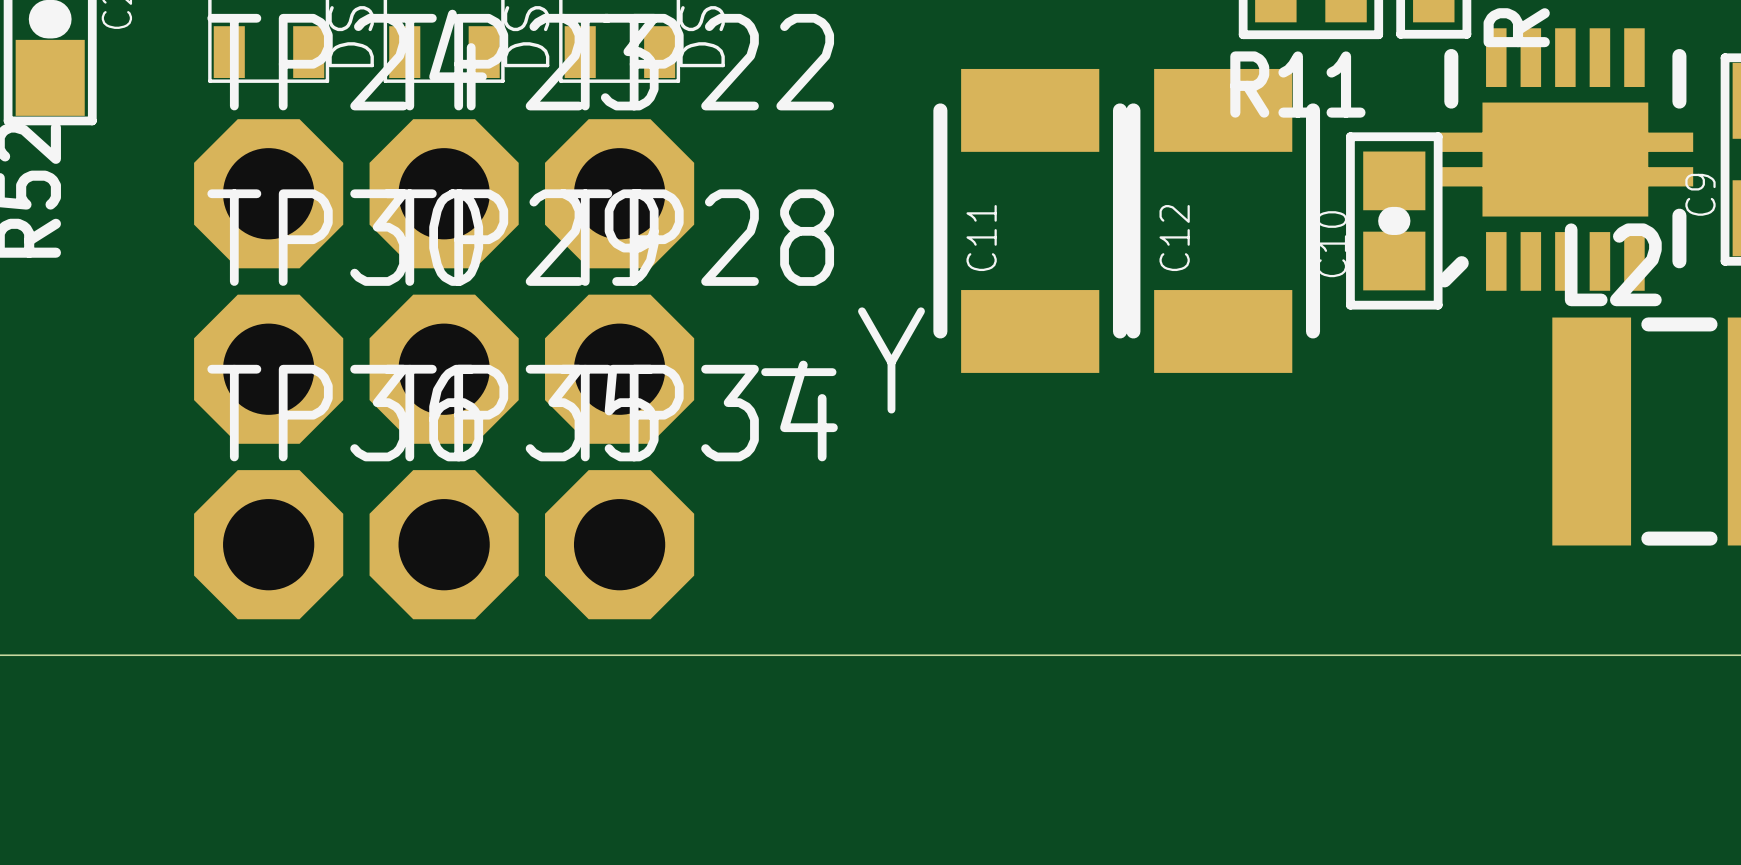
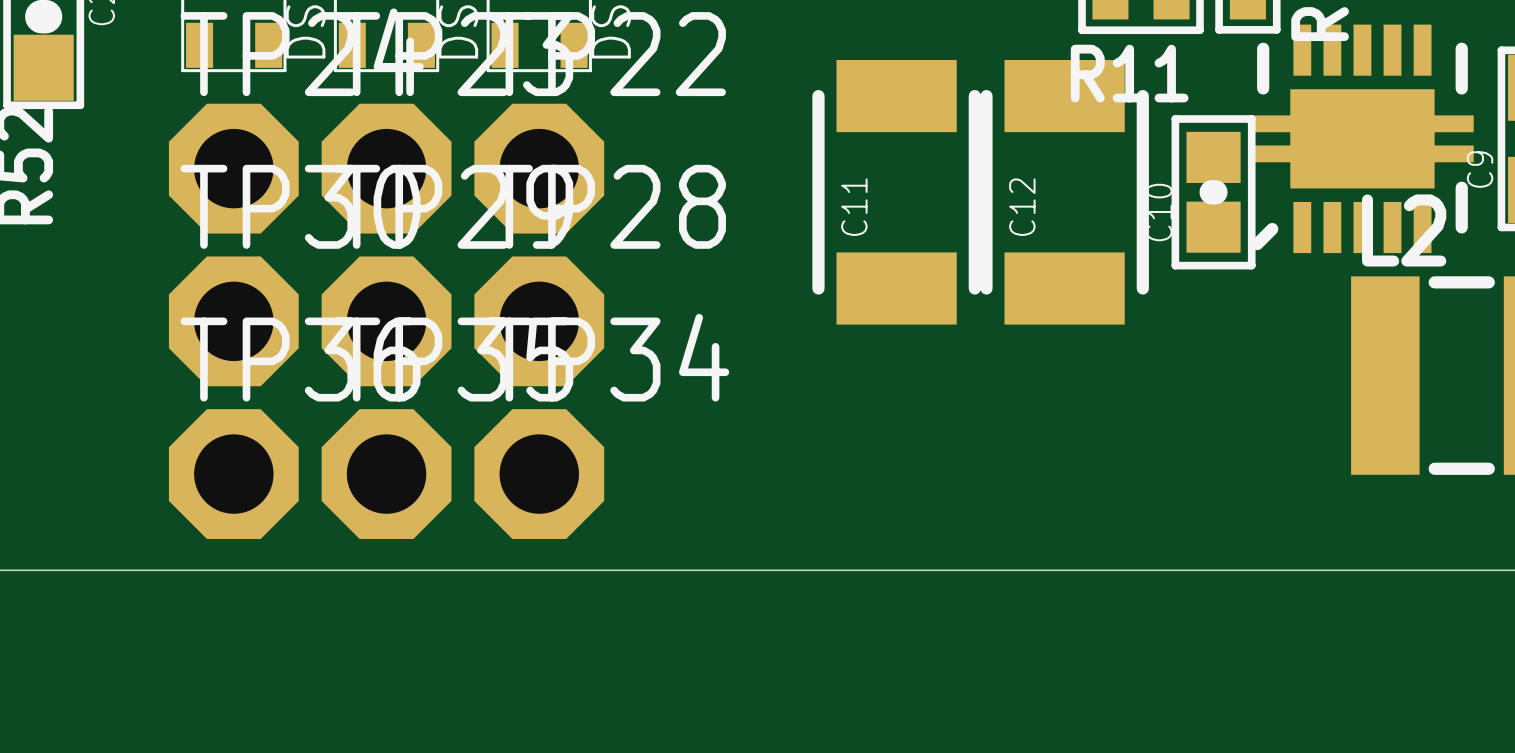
text: -Y (843, 360) -> none

